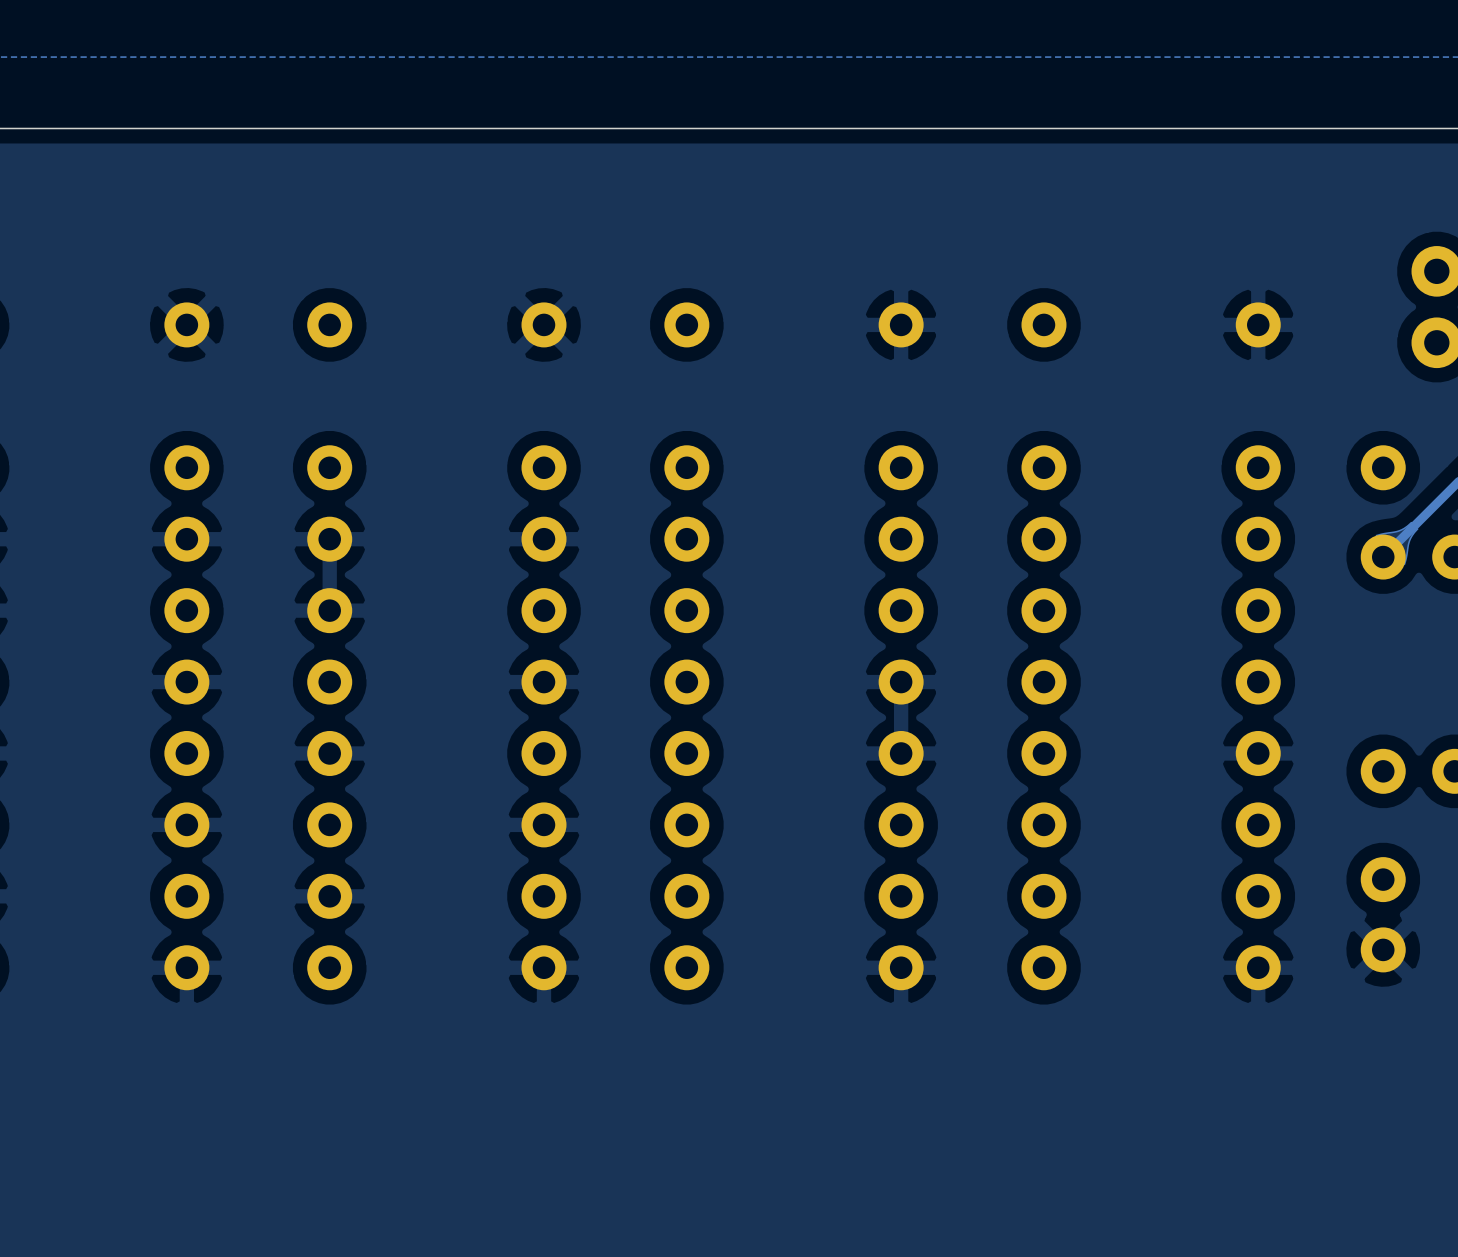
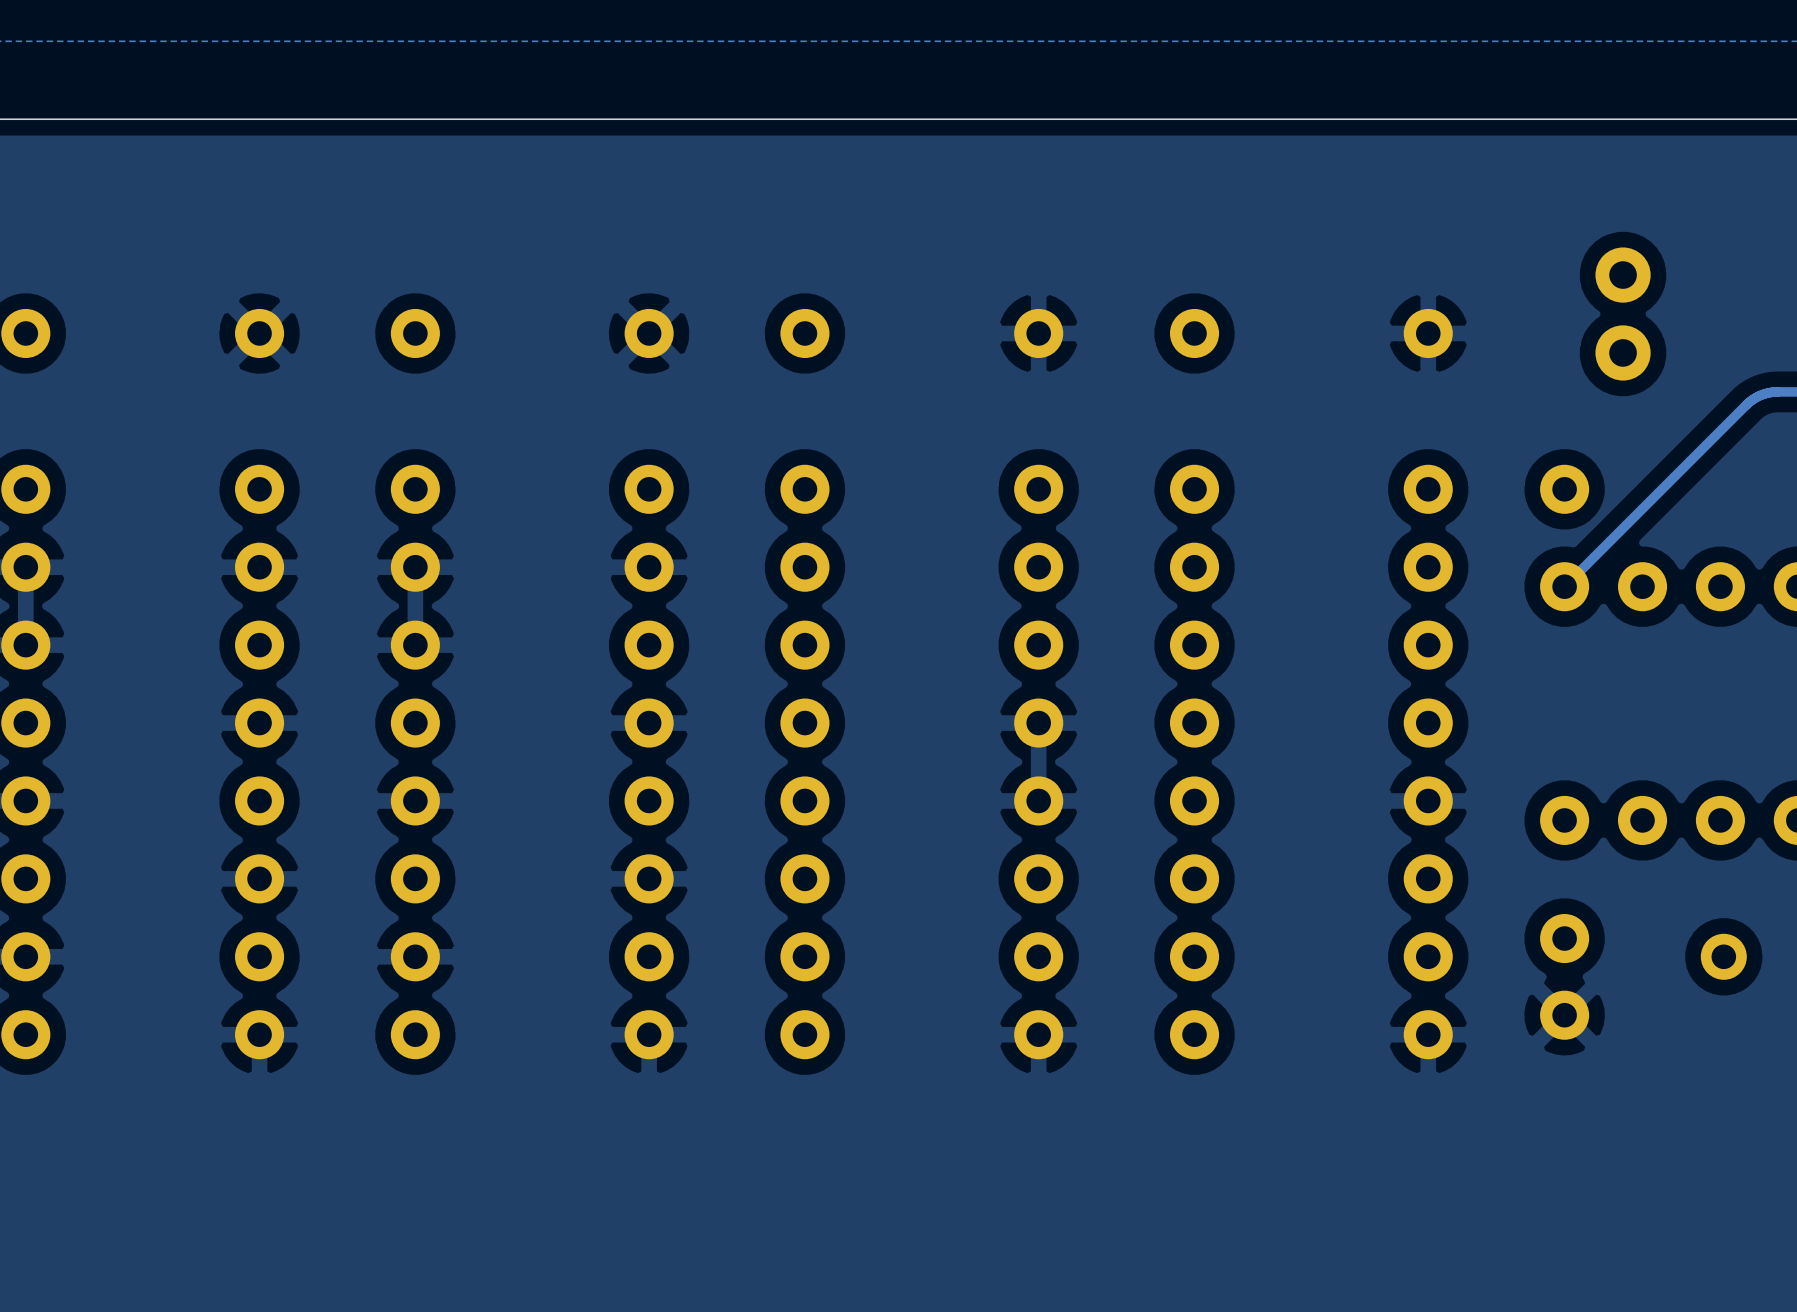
zone outline: (1411, 522) (1401, 530) (1375, 535) (1375, 565) (1404, 564) (1410, 539) (1417, 528) (1411, 522) -> none

